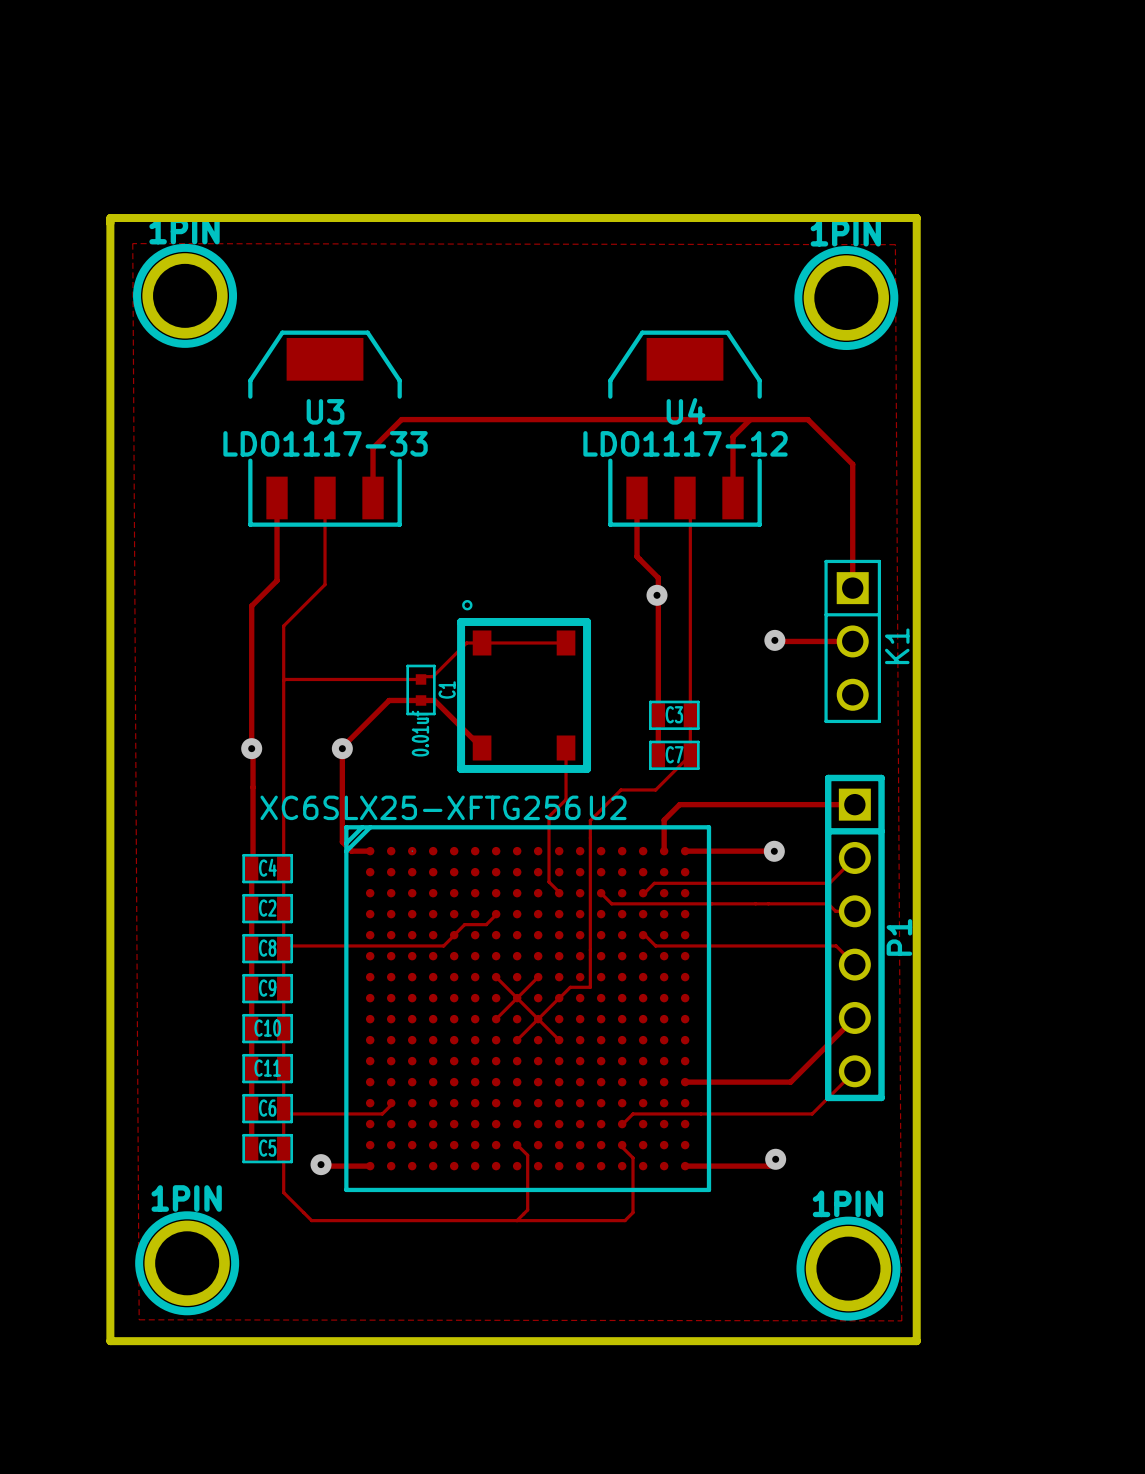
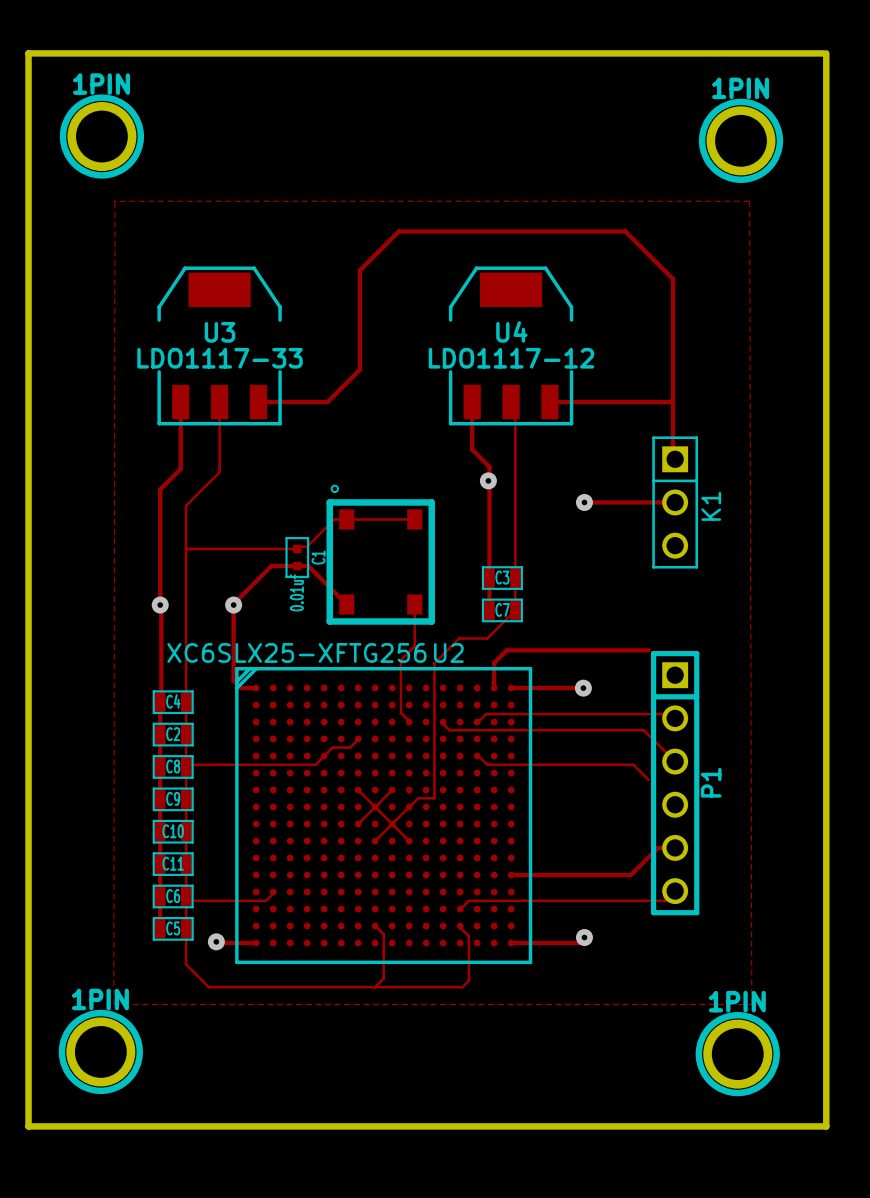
board edge: none -> (823, 53) (28, 53) (28, 1126) (826, 1126) (826, 53)
board edge: (110, 218) (110, 1341) (916, 1341) (916, 218) (110, 218) -> none
zone outline: (132, 243) (895, 244) (901, 1320) (139, 1319) (132, 243) -> (113, 201) (113, 1004) (751, 1004) (749, 201) (113, 201)
1PIN position: (185, 295) -> (101, 136)
1PIN position: (846, 298) -> (741, 140)
track: (750, 419) (733, 436) (733, 497) -> (672, 402) (549, 402)
track: (373, 497) (373, 448) (401, 419) (807, 419) (852, 464) (852, 588) -> (258, 402) (327, 402) (359, 369) (359, 270) (398, 231) (625, 231) (672, 279) (672, 457) (675, 459)
track: none -> (584, 502) (675, 502)
track: (774, 640) (852, 641) -> none
via position: (774, 640) -> (584, 502)
K1 position: (852, 641) -> (675, 502)
track: (854, 857) (829, 883) -> (675, 718) (670, 714) (628, 714)
track: (601, 893) (611, 903) (828, 903) (835, 911) (854, 911) -> (443, 722) (449, 730) (643, 730) (675, 761)
P1 position: (854, 937) -> (675, 783)
track: (854, 1017) (790, 1082) -> (670, 847) (675, 847) (657, 847) (630, 875) (596, 875)
track: (854, 1071) (812, 1113) -> (675, 891) (665, 900) (614, 900)
1PIN position: (187, 1263) -> (100, 1051)
1PIN position: (848, 1268) -> (737, 1054)

